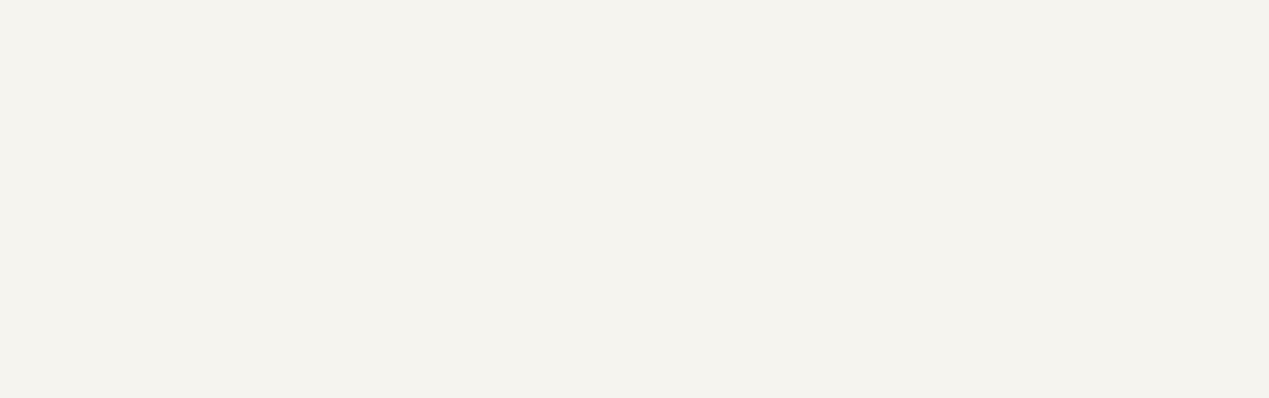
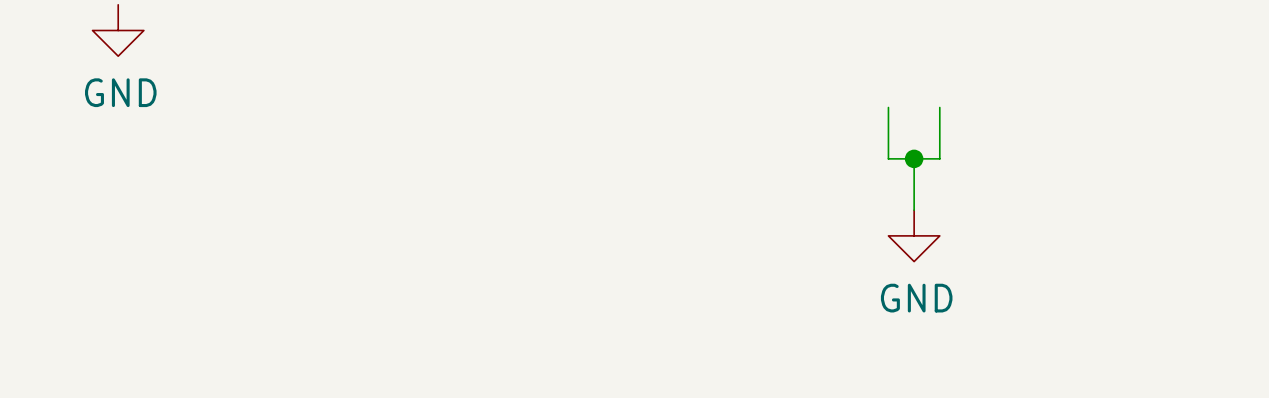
power symbol: none -> GND (118, 30)
wire: none -> (888, 107) (888, 158) (939, 158) (939, 107)
wire: none -> (914, 158) (914, 210)
junction: none -> (914, 158)
power symbol: none -> GND (914, 235)

